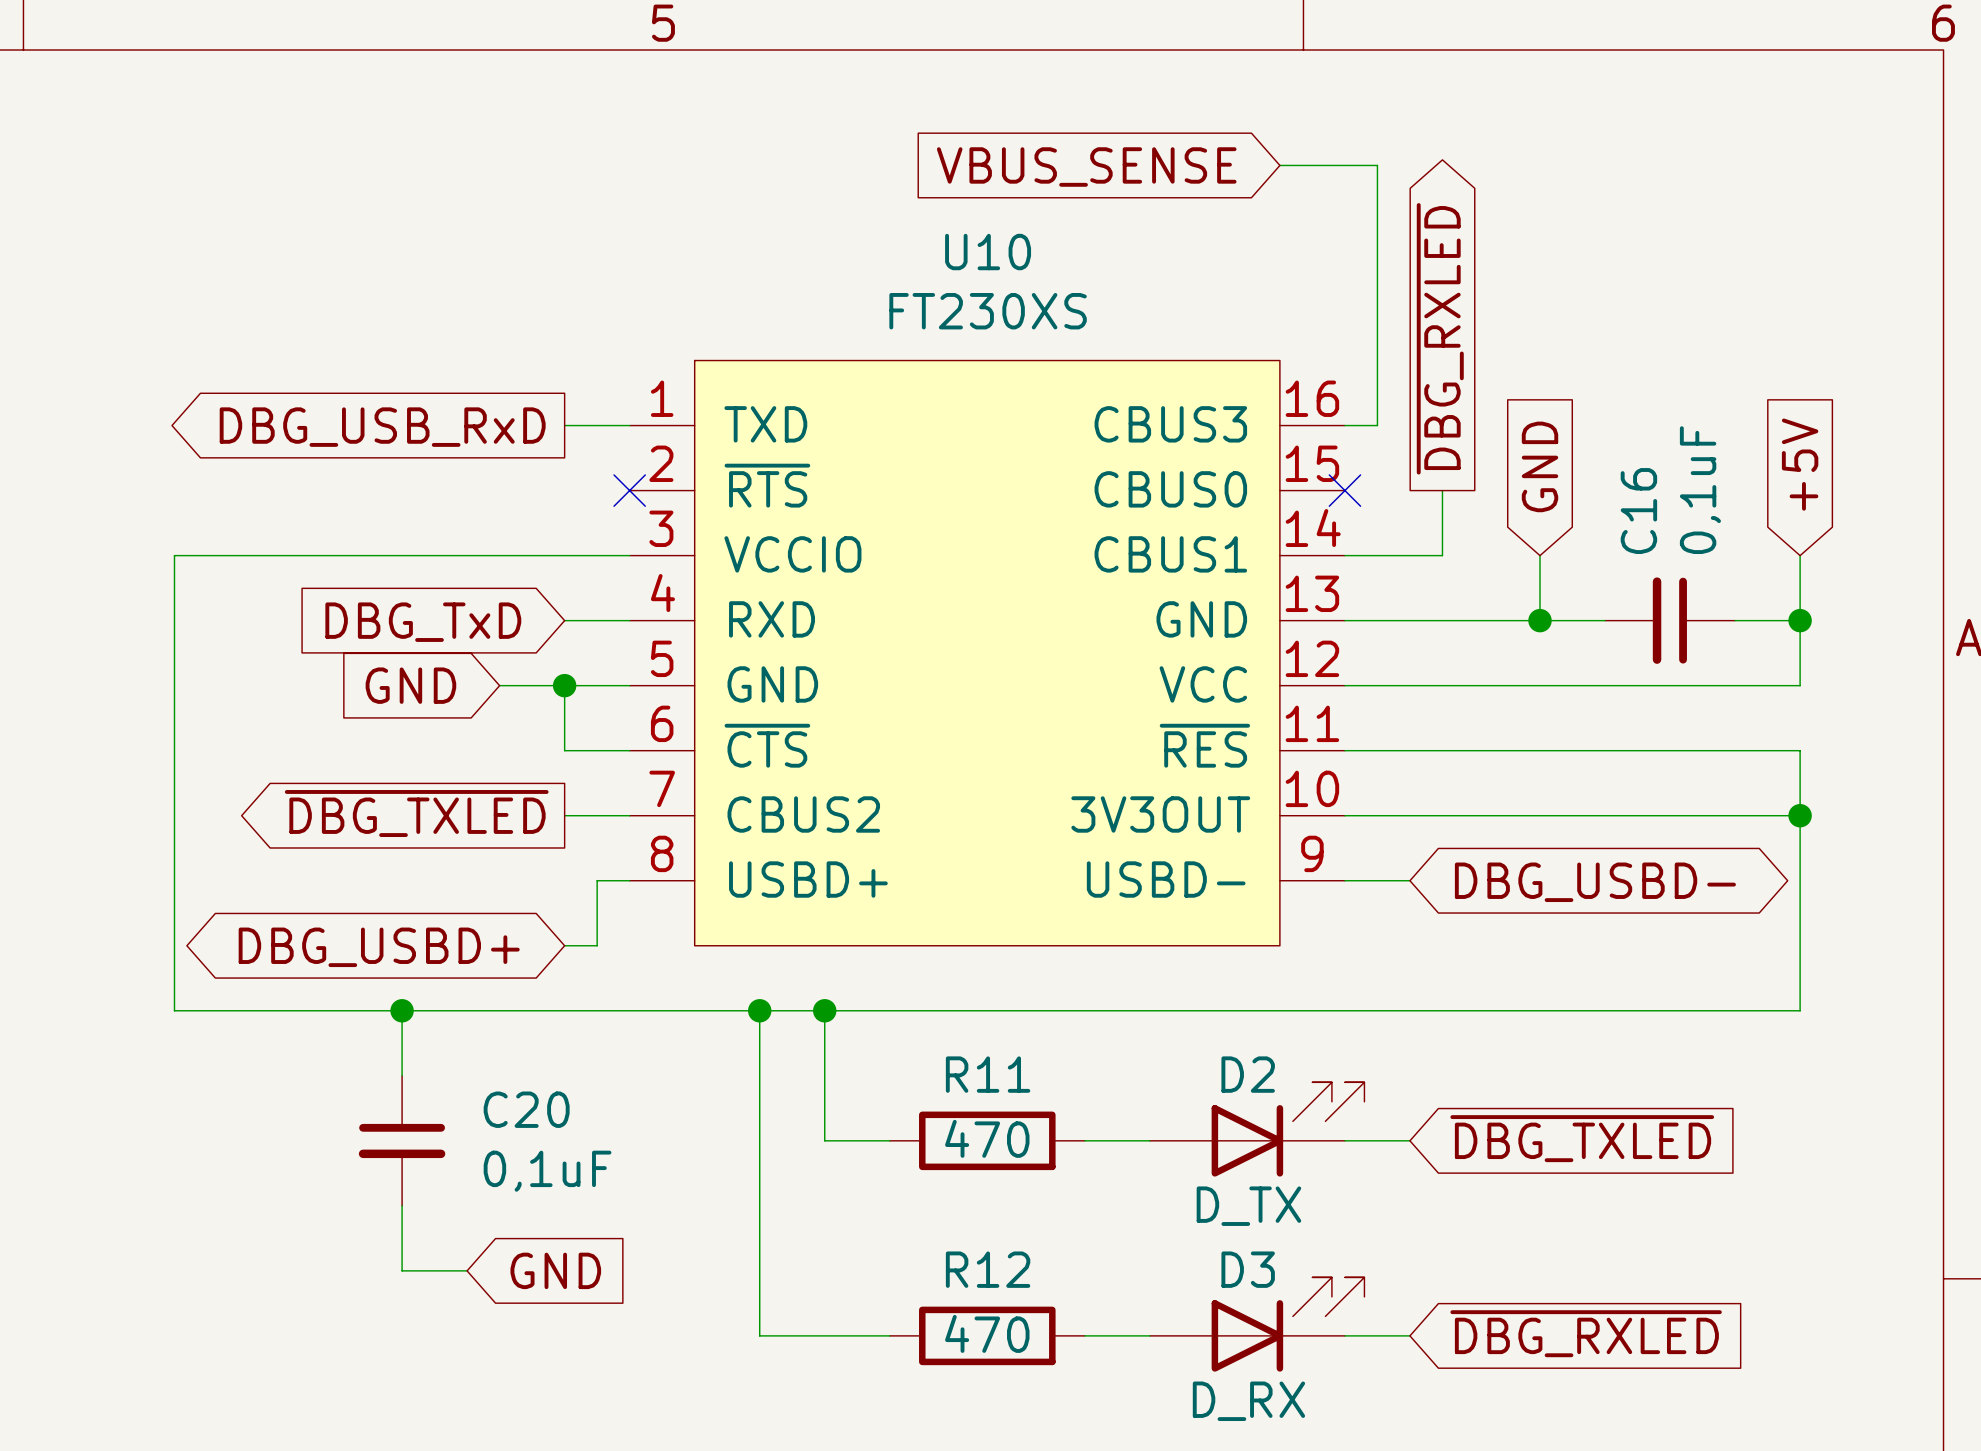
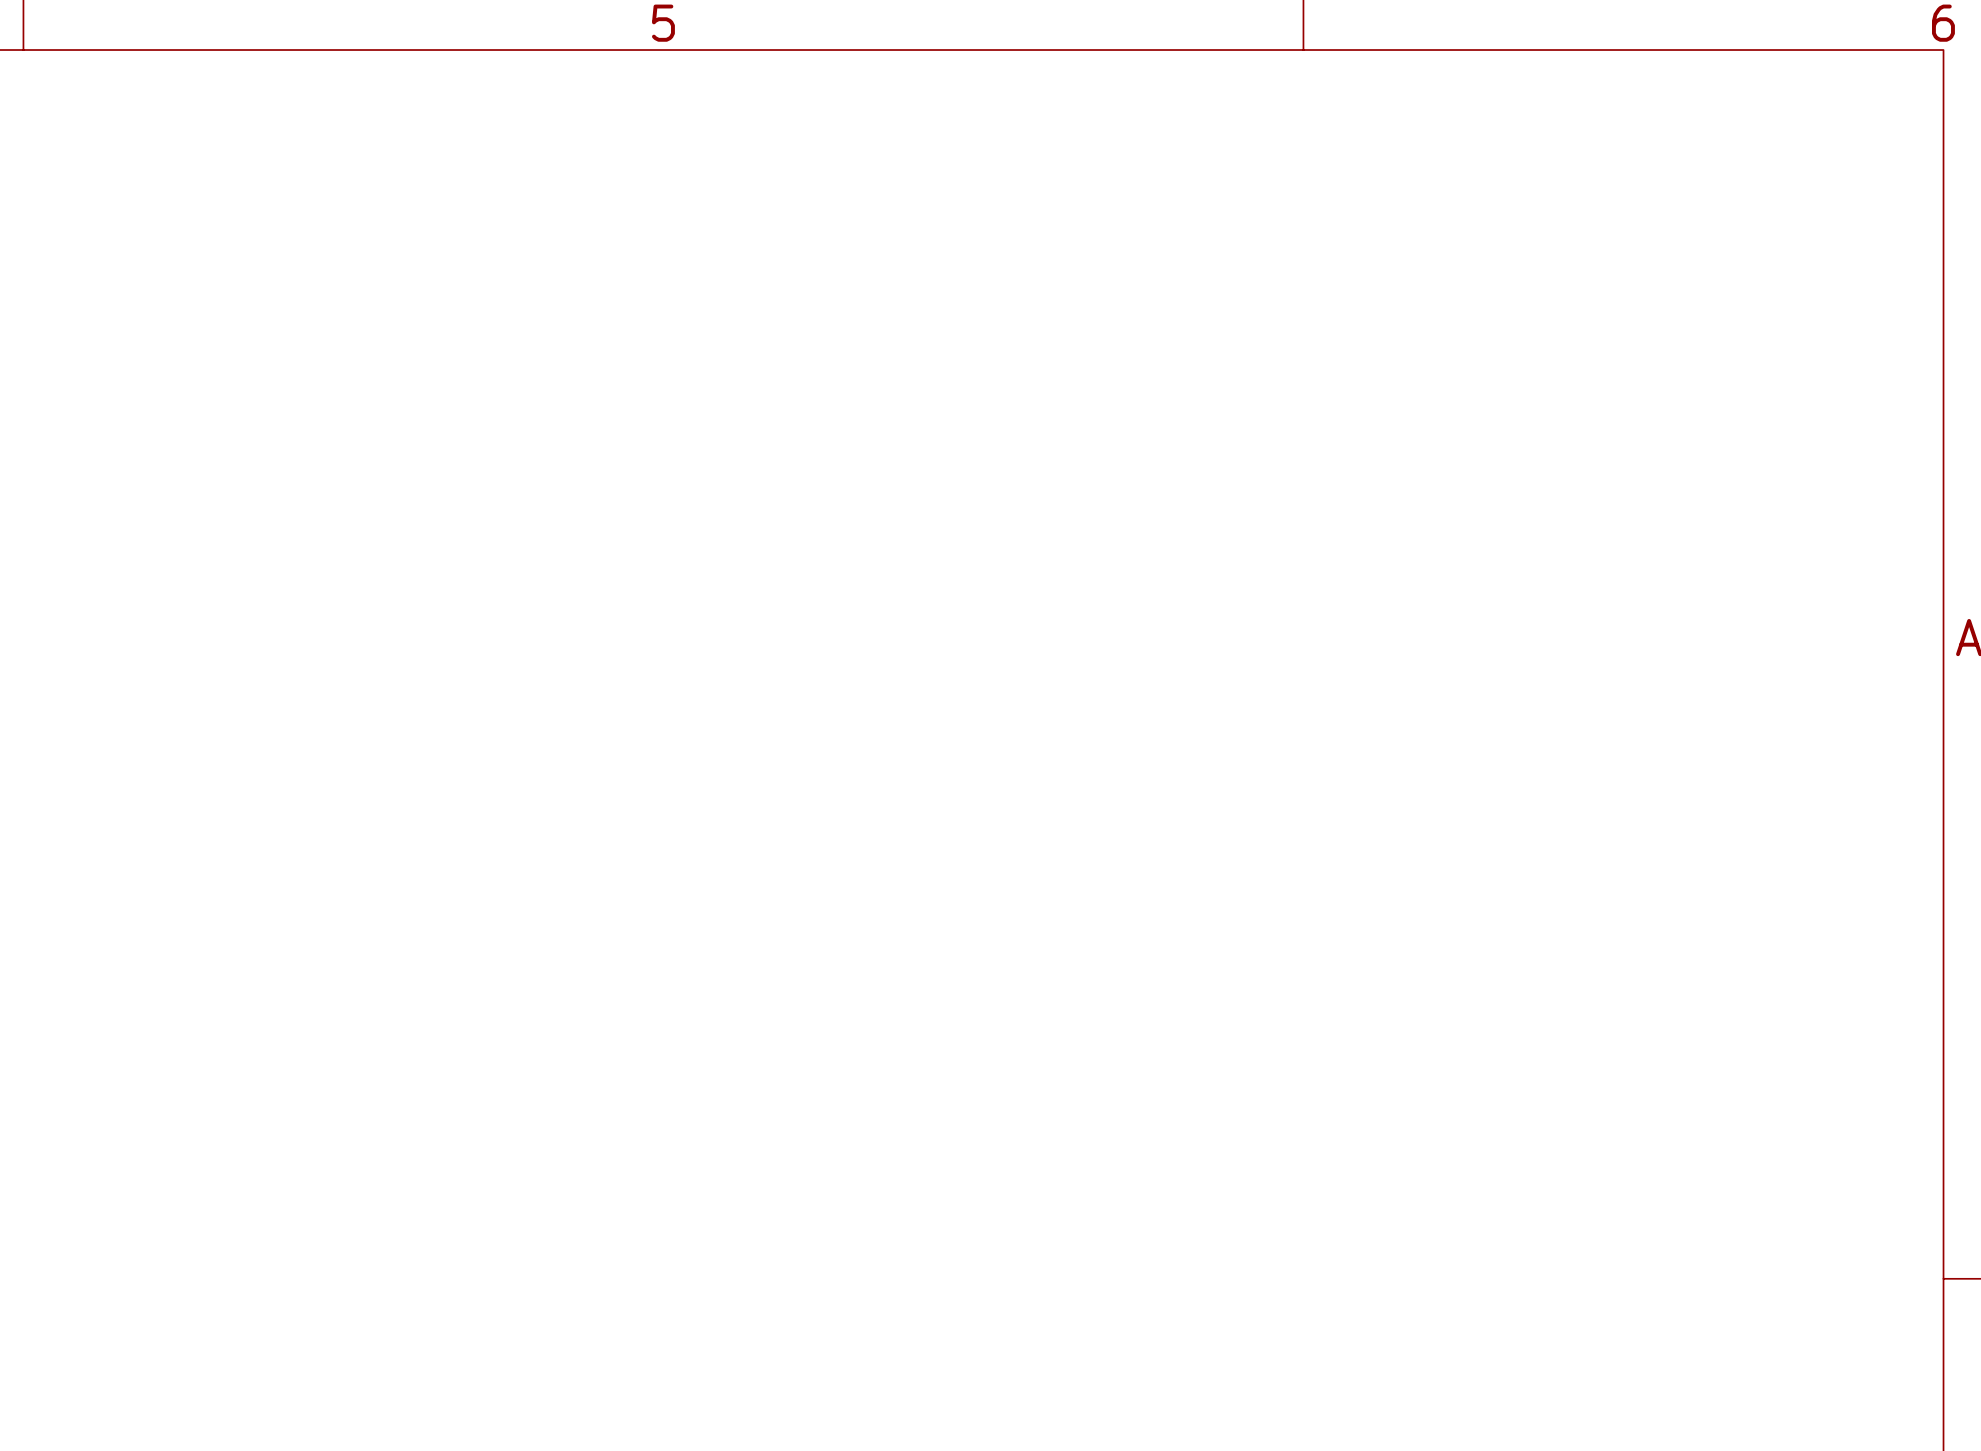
wire: (1279, 165) (1377, 165) (1377, 425) (1344, 425) -> none
global label: VBUS_SENSE (1086, 167) -> none
global label: ~{DBG_RXLED} (1440, 338) -> none
wire: (564, 425) (629, 425) -> none
global label: DBG_USB_RxD (382, 427) -> none
global label: +5V (1800, 464) -> none
global label: GND (1540, 466) -> none
no-connect mark: (629, 490) -> none
no-connect mark: (1344, 490) -> none
wire: (1442, 490) (1442, 555) (1344, 555) -> none
wire: (629, 555) (174, 555) (174, 1010) (1800, 1010) (1800, 750) (1344, 750) -> none
wire: (1540, 555) (1540, 620) -> none
wire: (1800, 555) (1800, 685) (1344, 685) -> none
wire: (564, 620) (629, 620) -> none
wire: (1344, 620) (1605, 620) -> none
junction: (1540, 620) -> none
C16: 0,1uF (1670, 620) -> none
wire: (1735, 620) (1800, 620) -> none
junction: (1800, 620) -> none
global label: DBG_TxD (423, 622) -> none
U10: FT230XS (987, 653) -> none
global label: GND (410, 685) -> none
wire: (499, 685) (629, 685) -> none
wire: (564, 685) (564, 750) (629, 750) -> none
junction: (564, 685) -> none
global label: ~{DBG_TXLED} (416, 813) -> none
wire: (564, 815) (629, 815) -> none
wire: (1344, 815) (1800, 815) -> none
junction: (1800, 815) -> none
wire: (629, 880) (597, 880) (597, 945) (564, 945) -> none
wire: (1344, 880) (1409, 880) -> none
global label: DBG_USBD- (1595, 882) -> none
global label: DBG_USBD+ (379, 947) -> none
wire: (402, 1010) (402, 1075) -> none
junction: (402, 1010) -> none
wire: (759, 1010) (759, 1335) (889, 1335) -> none
junction: (759, 1010) -> none
wire: (824, 1010) (824, 1140) (889, 1140) -> none
junction: (824, 1010) -> none
D2: D_TX (1257, 1129) -> none
global label: ~{DBG_TXLED} (1582, 1138) -> none
C20: 0,1uF (402, 1140) -> none
R11: 470 (987, 1140) -> none
wire: (1084, 1140) (1149, 1140) -> none
wire: (1344, 1140) (1409, 1140) -> none
wire: (402, 1205) (402, 1270) (467, 1270) -> none
global label: GND (555, 1270) -> none
D3: D_RX (1257, 1324) -> none
global label: ~{DBG_RXLED} (1586, 1333) -> none
R12: 470 (987, 1335) -> none
wire: (1084, 1335) (1149, 1335) -> none
wire: (1344, 1335) (1409, 1335) -> none

